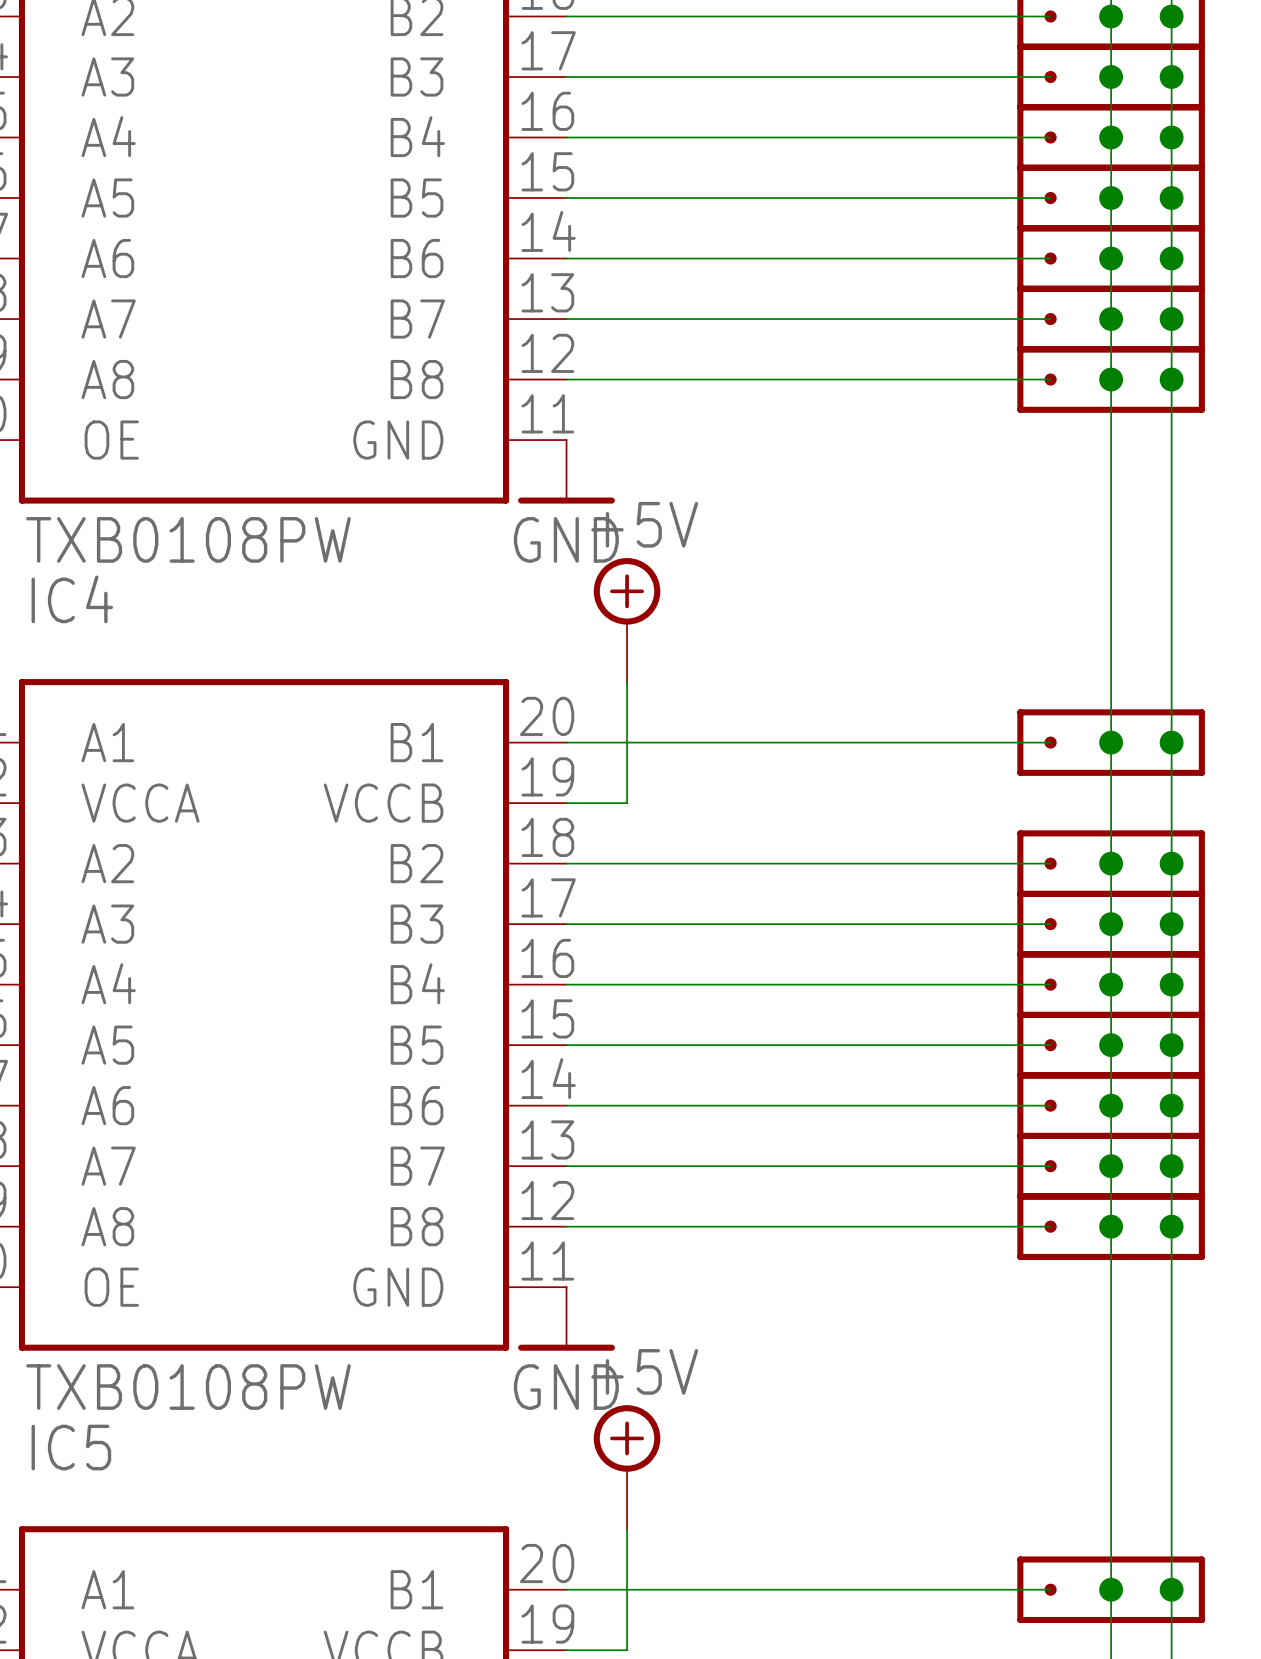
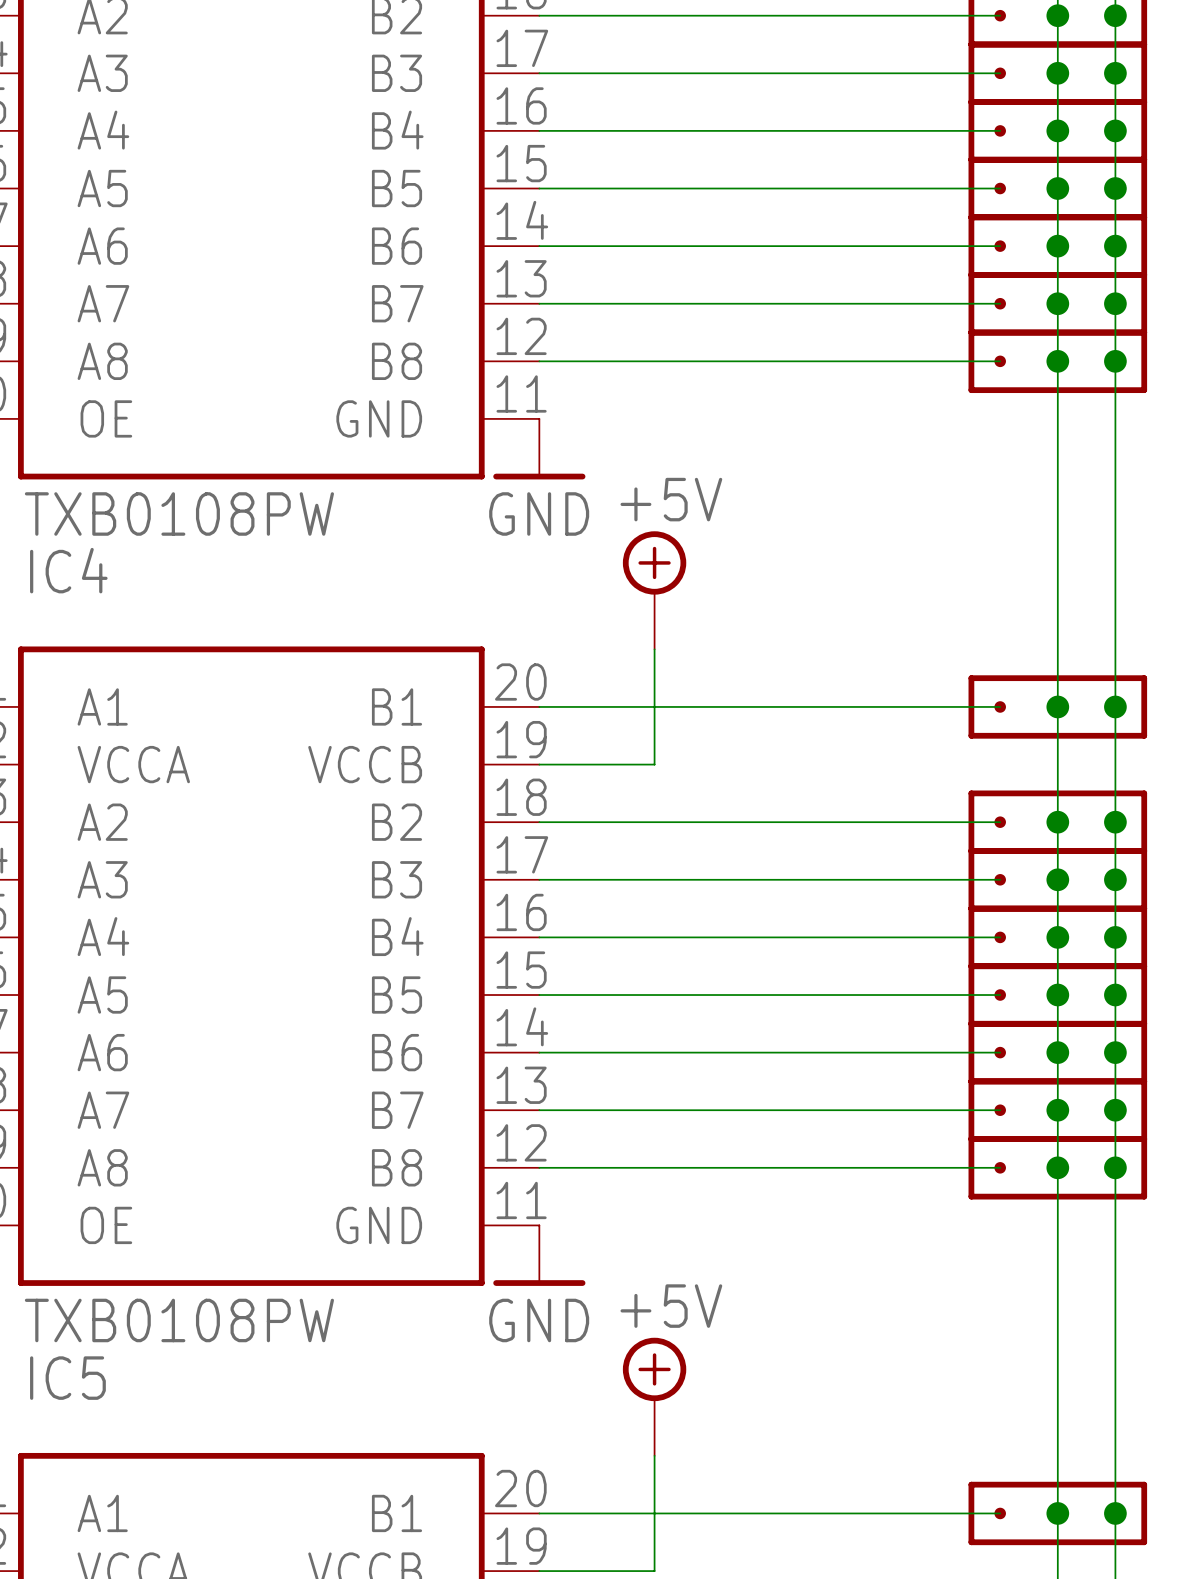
power symbol position: +5V (627, 620) -> +5V (654, 590)
wire: (627, 682) (627, 803) -> (654, 649) (654, 764) (596, 764)
power symbol position: +5V (627, 1467) -> +5V (654, 1396)
wire: (627, 1529) (627, 1650) -> (654, 1455) (654, 1571) (596, 1571)

